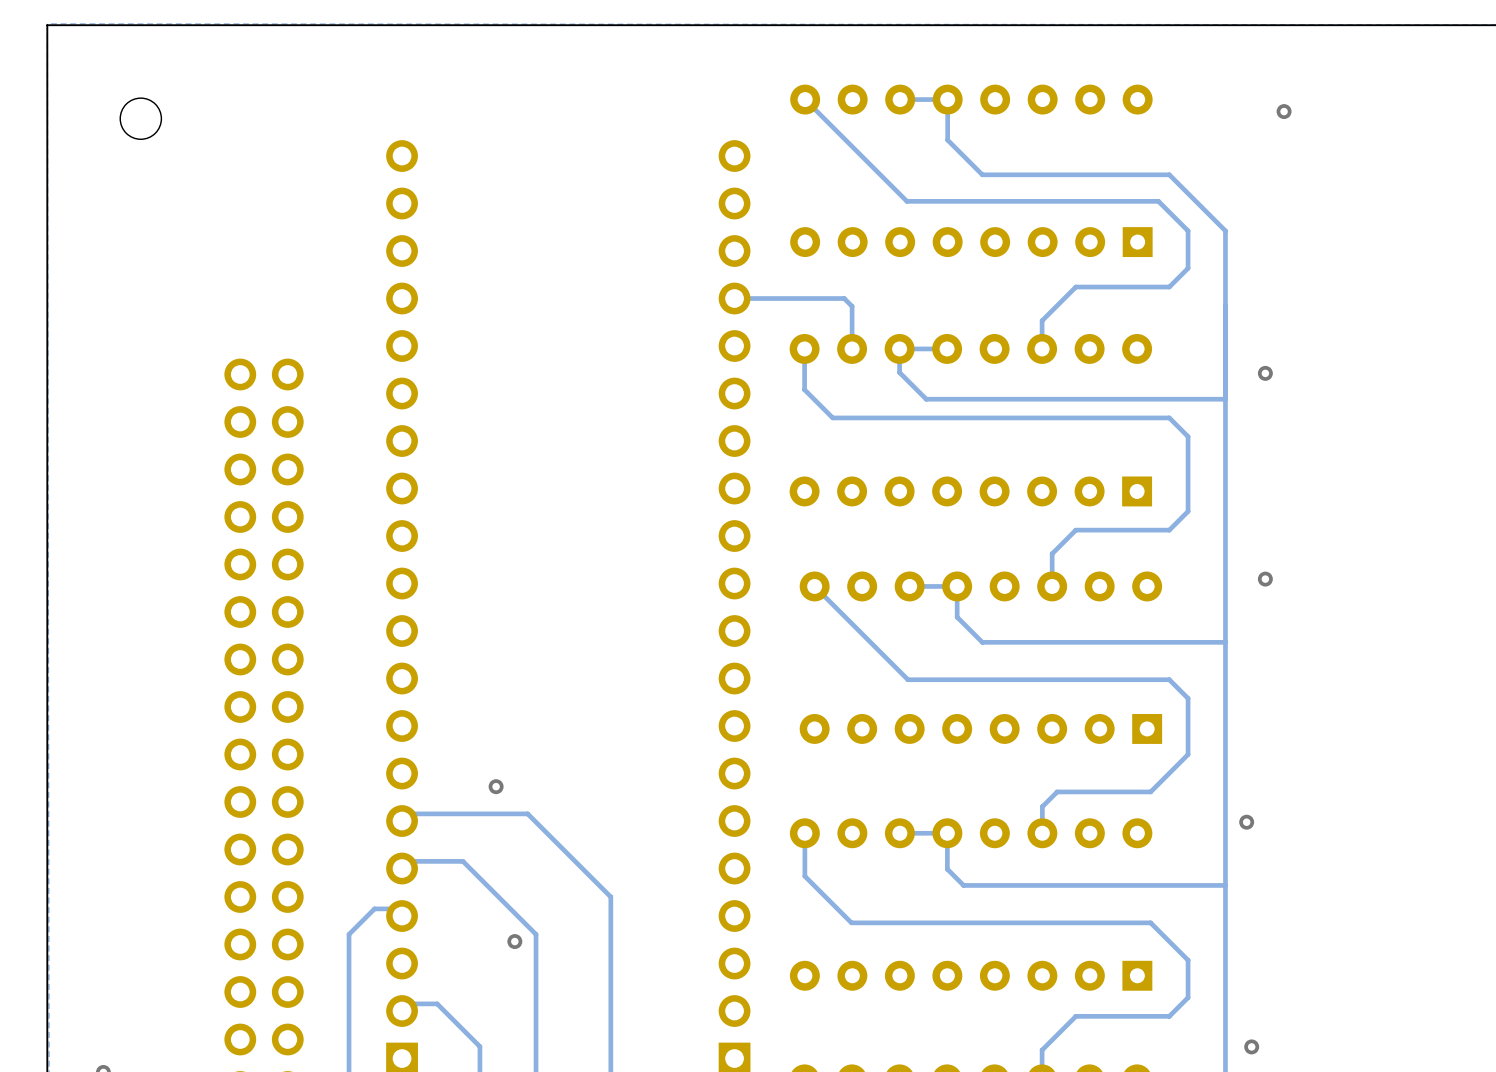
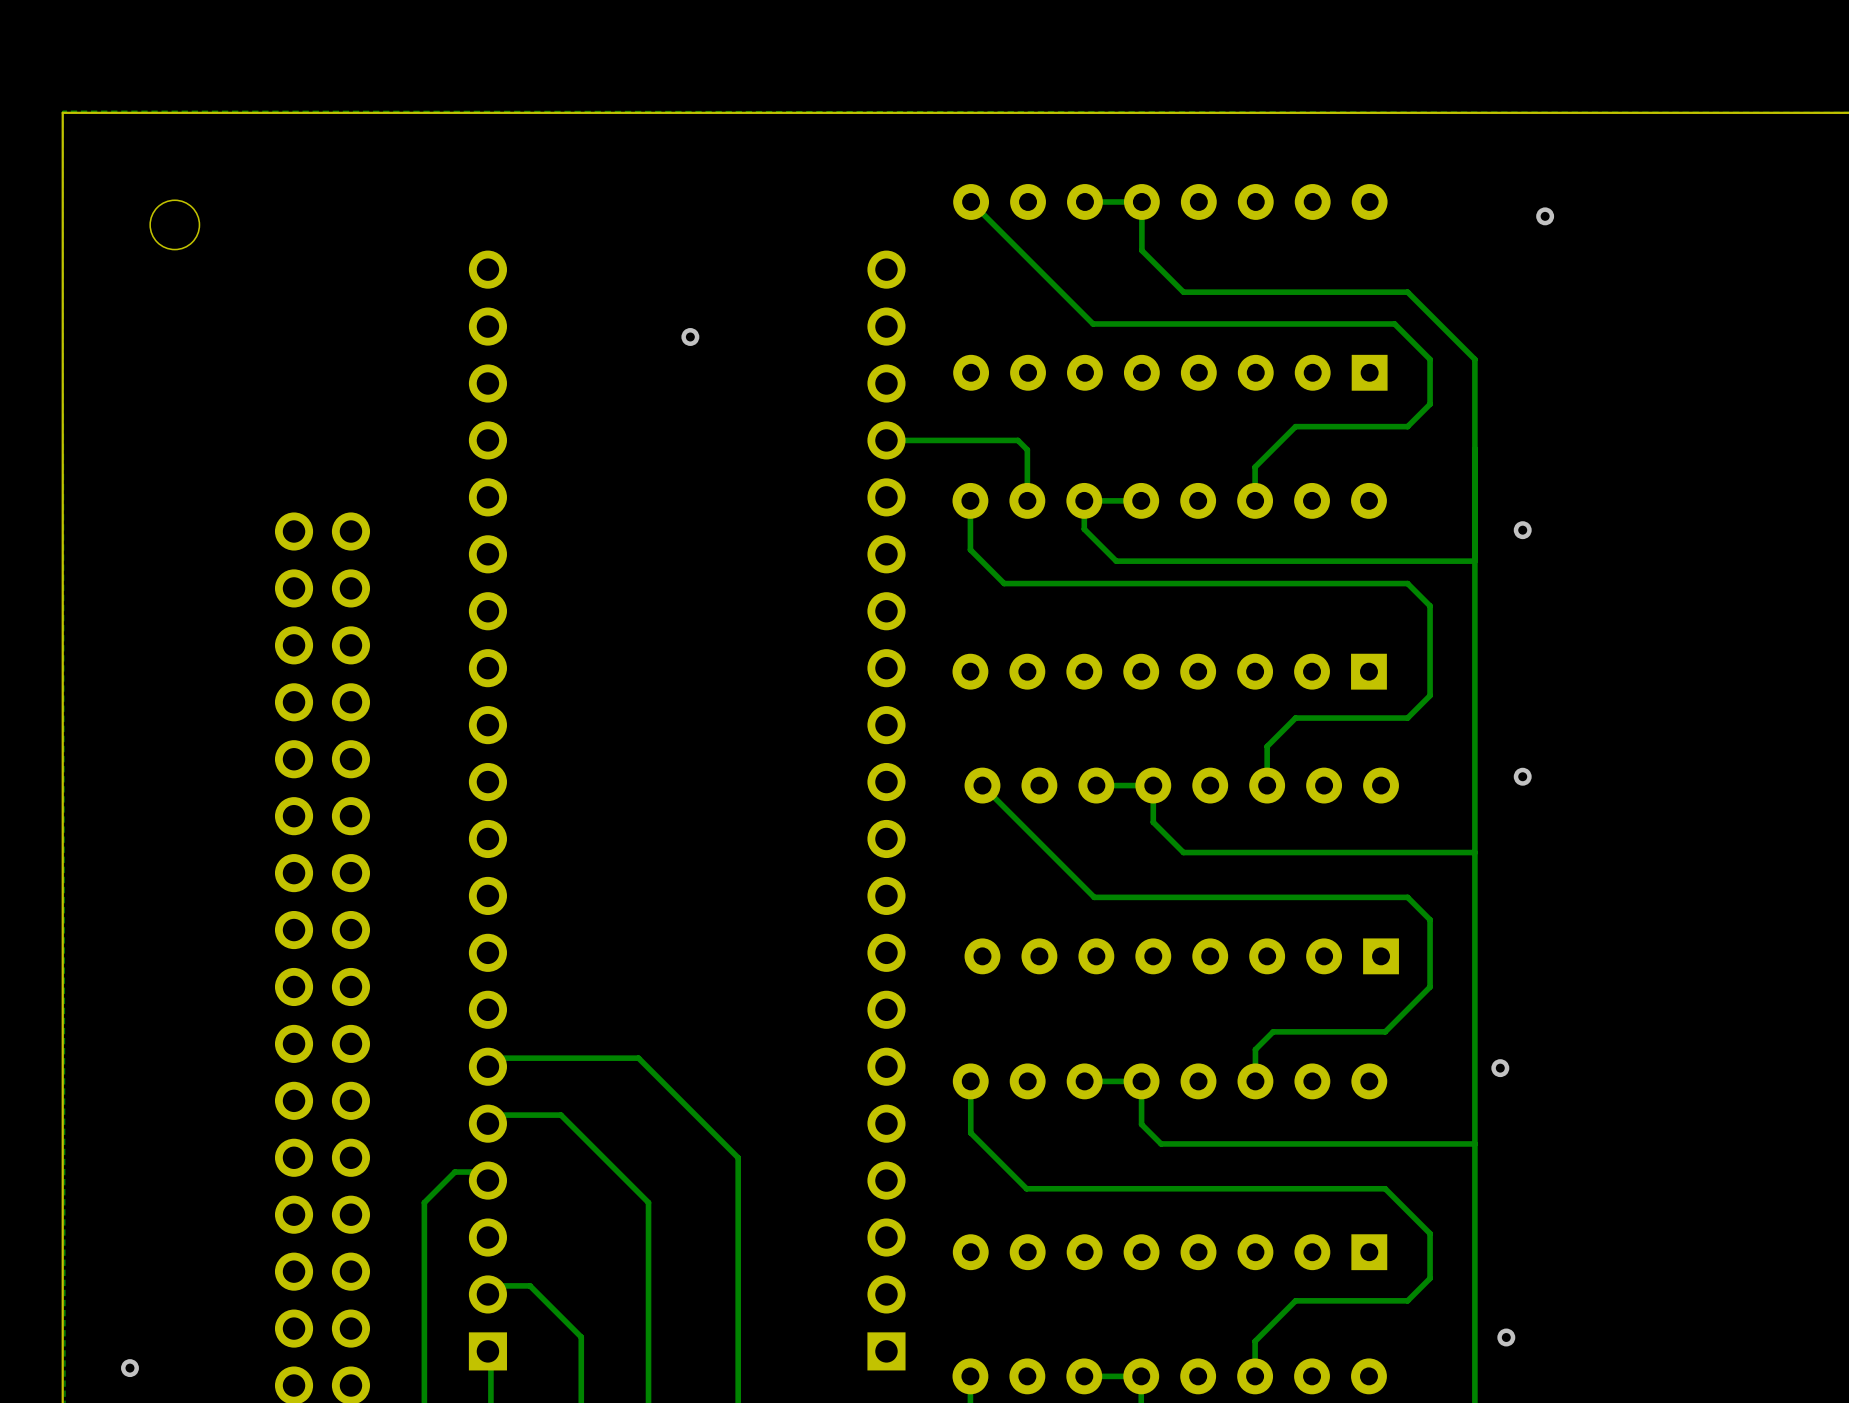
via: none -> (690, 336)
via: (496, 786) -> none
via: (514, 941) -> none

